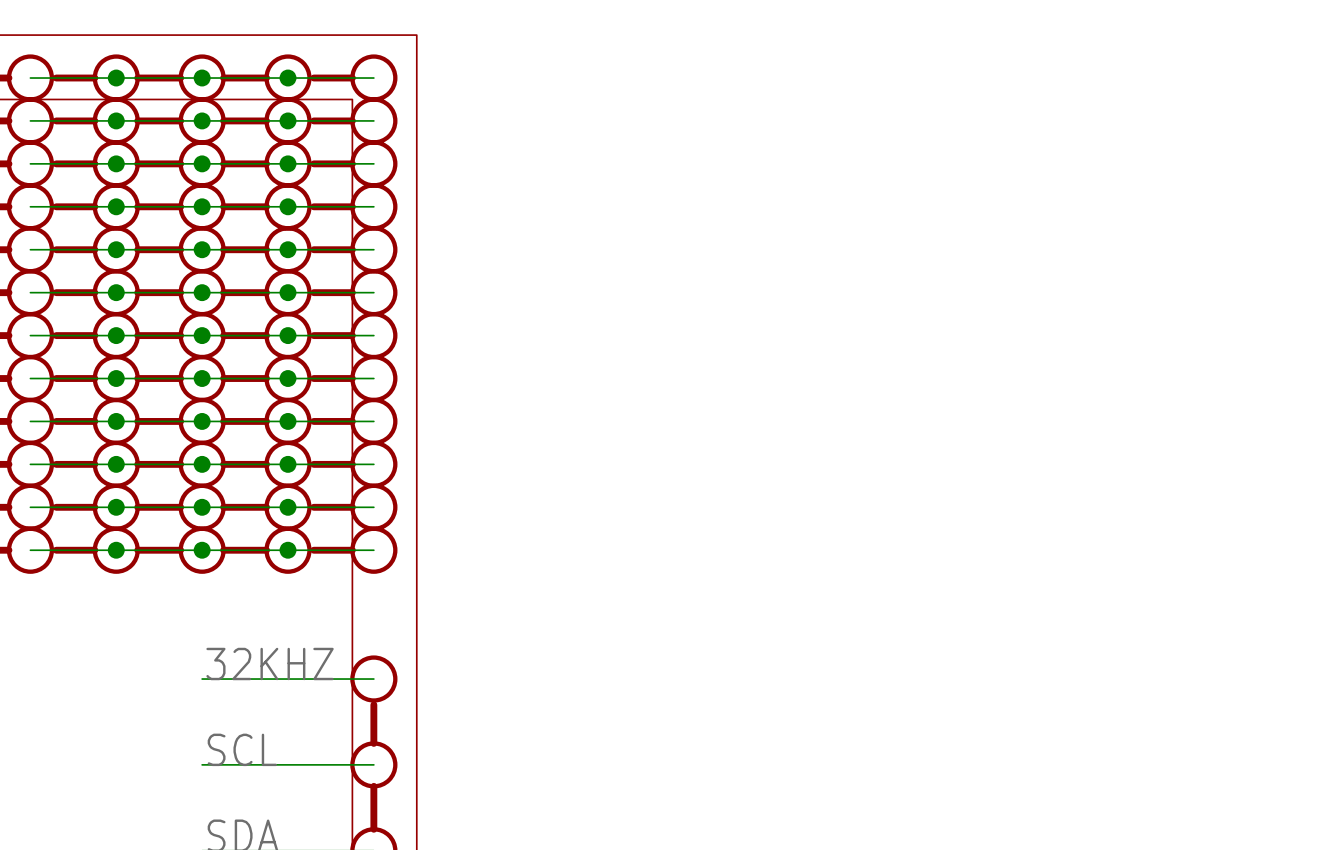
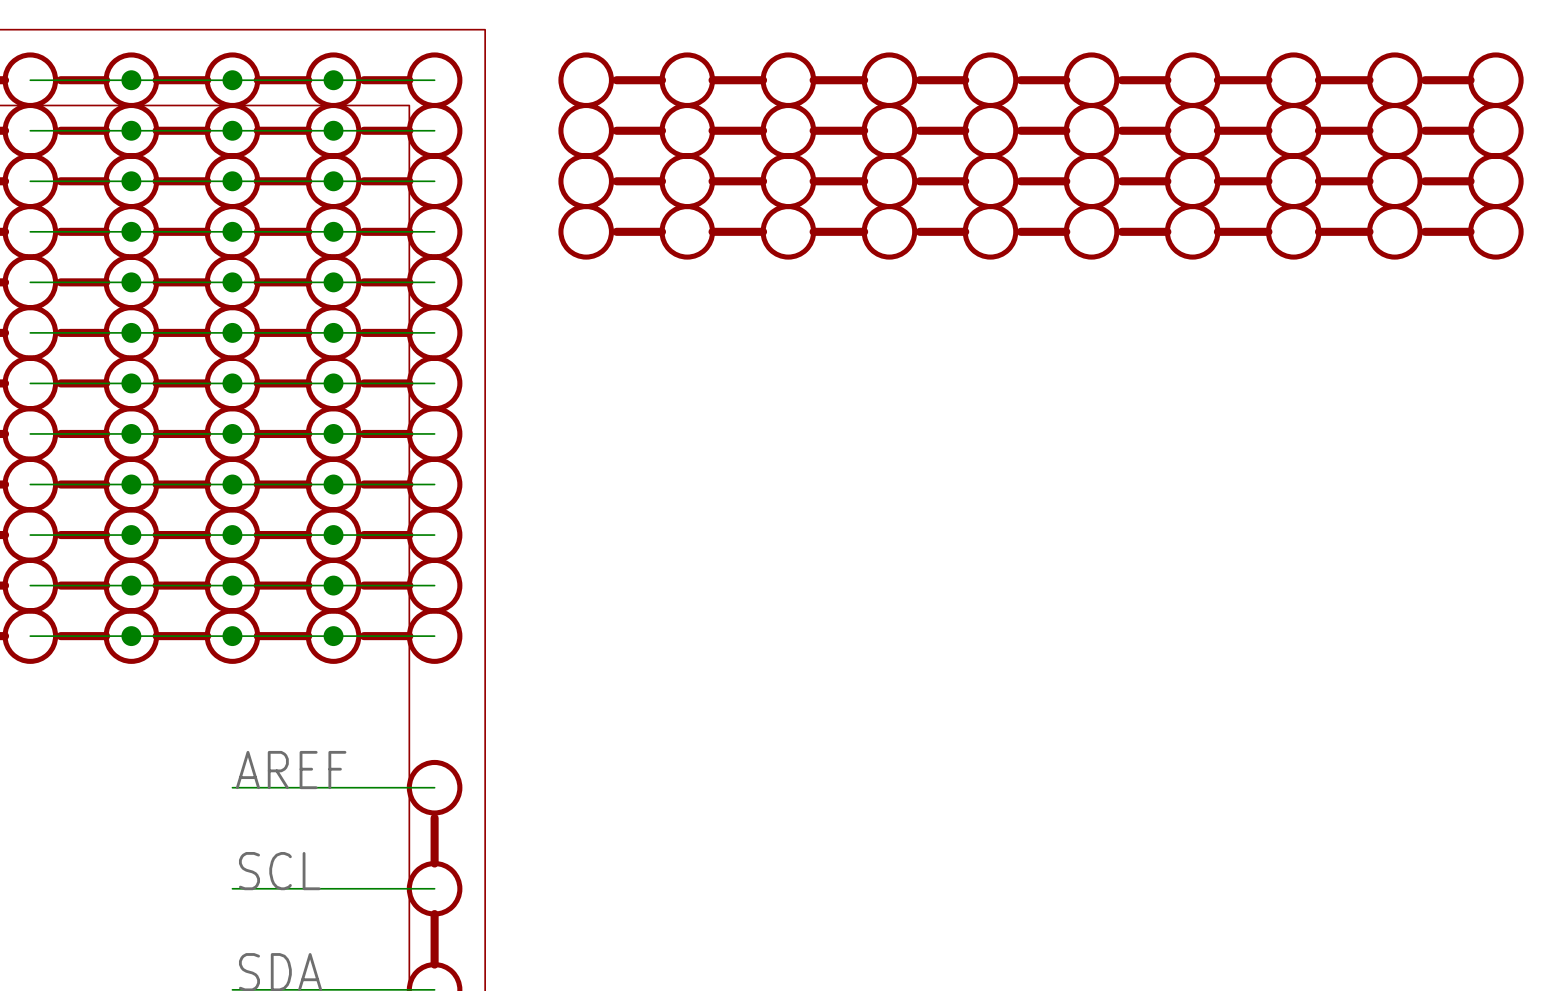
part: none -> (1041, 80)
part: none -> (1041, 130)
part: none -> (1041, 181)
part: none -> (1041, 231)
label: 32KHZ (270, 664) -> AREF (291, 770)

